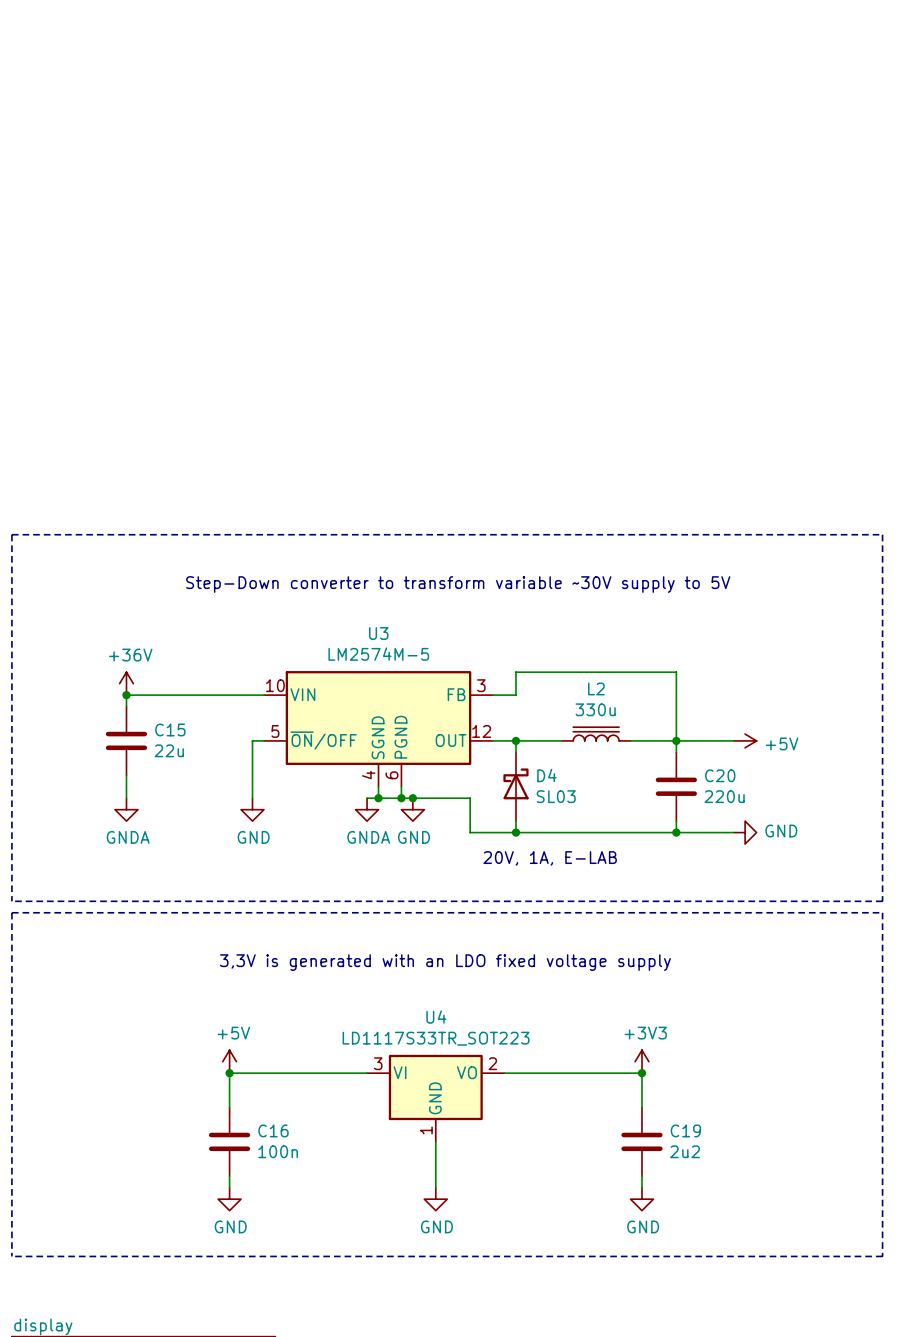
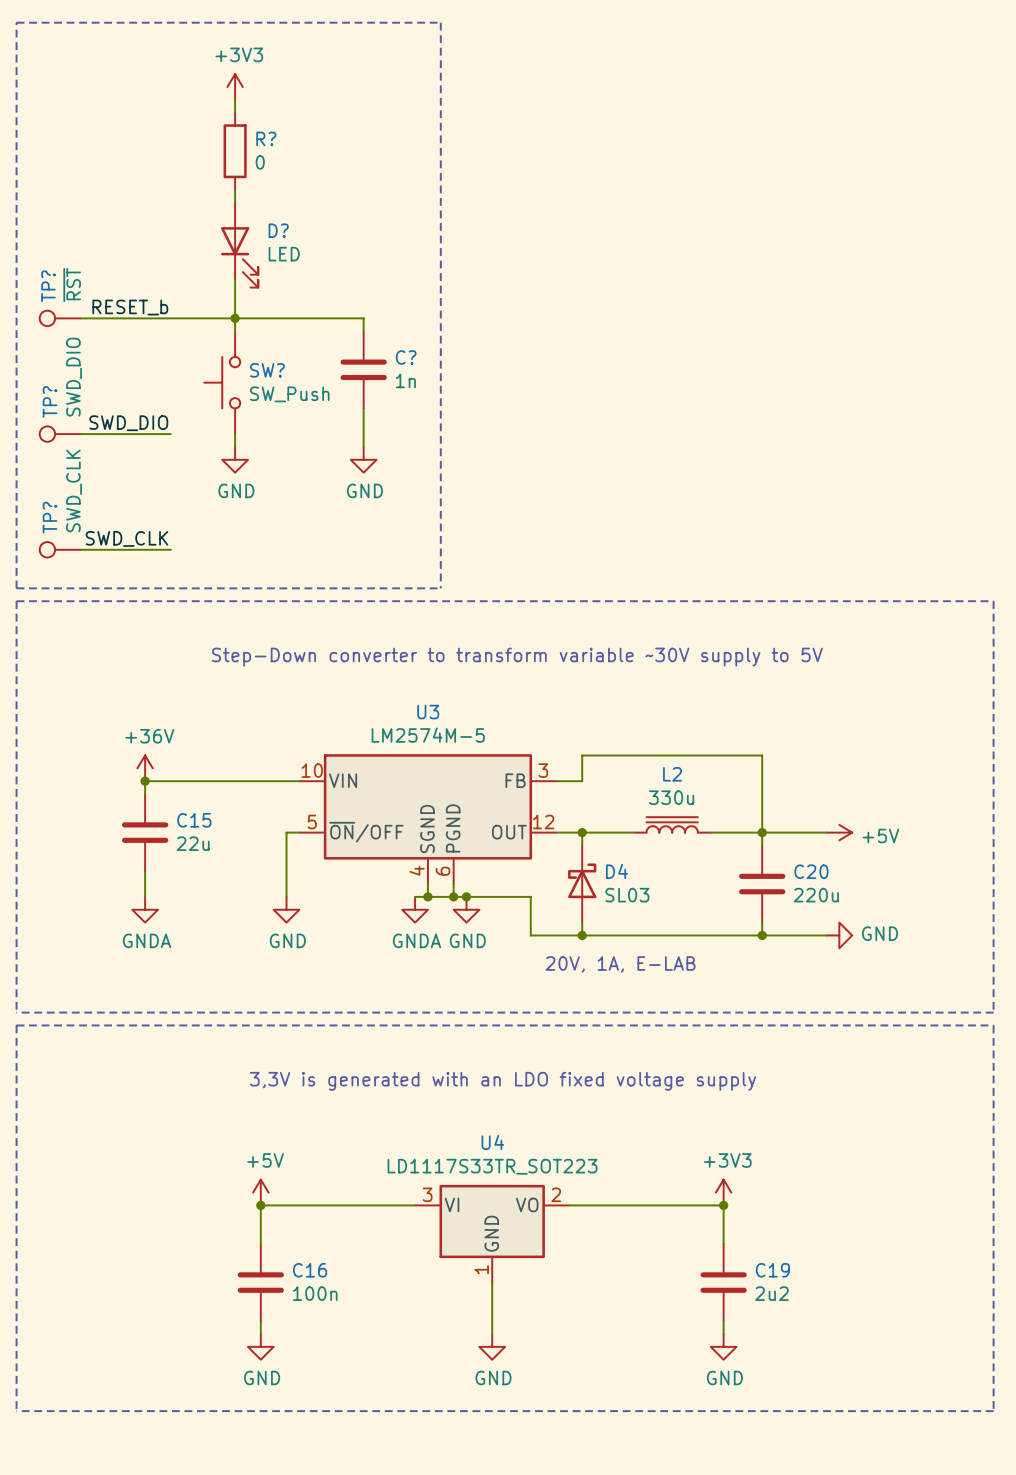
line: none -> (16, 22) (16, 588) (440, 588) (440, 22) (16, 22)
power symbol: none -> +3V3 (235, 86)
wire: none -> (235, 99) (235, 112)
R?: none -> 0 (235, 151)
wire: none -> (235, 189) (235, 202)
D?: none -> LED (239, 245)
wire: none -> (235, 279) (235, 331)
label: none -> RESET_b (130, 307)
TP?: none -> ~{RST} (60, 318)
wire: none -> (80, 318) (363, 318) (363, 331)
junction: none -> (235, 318)
C?: none -> 1n (363, 369)
SW?: none -> SW_Push (222, 382)
wire: none -> (363, 408) (363, 446)
label: none -> SWD_DIO (128, 423)
TP?: none -> SWD_DIO (60, 434)
wire: none -> (80, 434) (170, 434)
wire: none -> (235, 434) (235, 446)
power symbol: none -> GND (235, 459)
power symbol: none -> GND (363, 459)
label: none -> SWD_CLK (126, 538)
TP?: none -> SWD_CLK (60, 549)
wire: none -> (80, 549) (170, 549)

